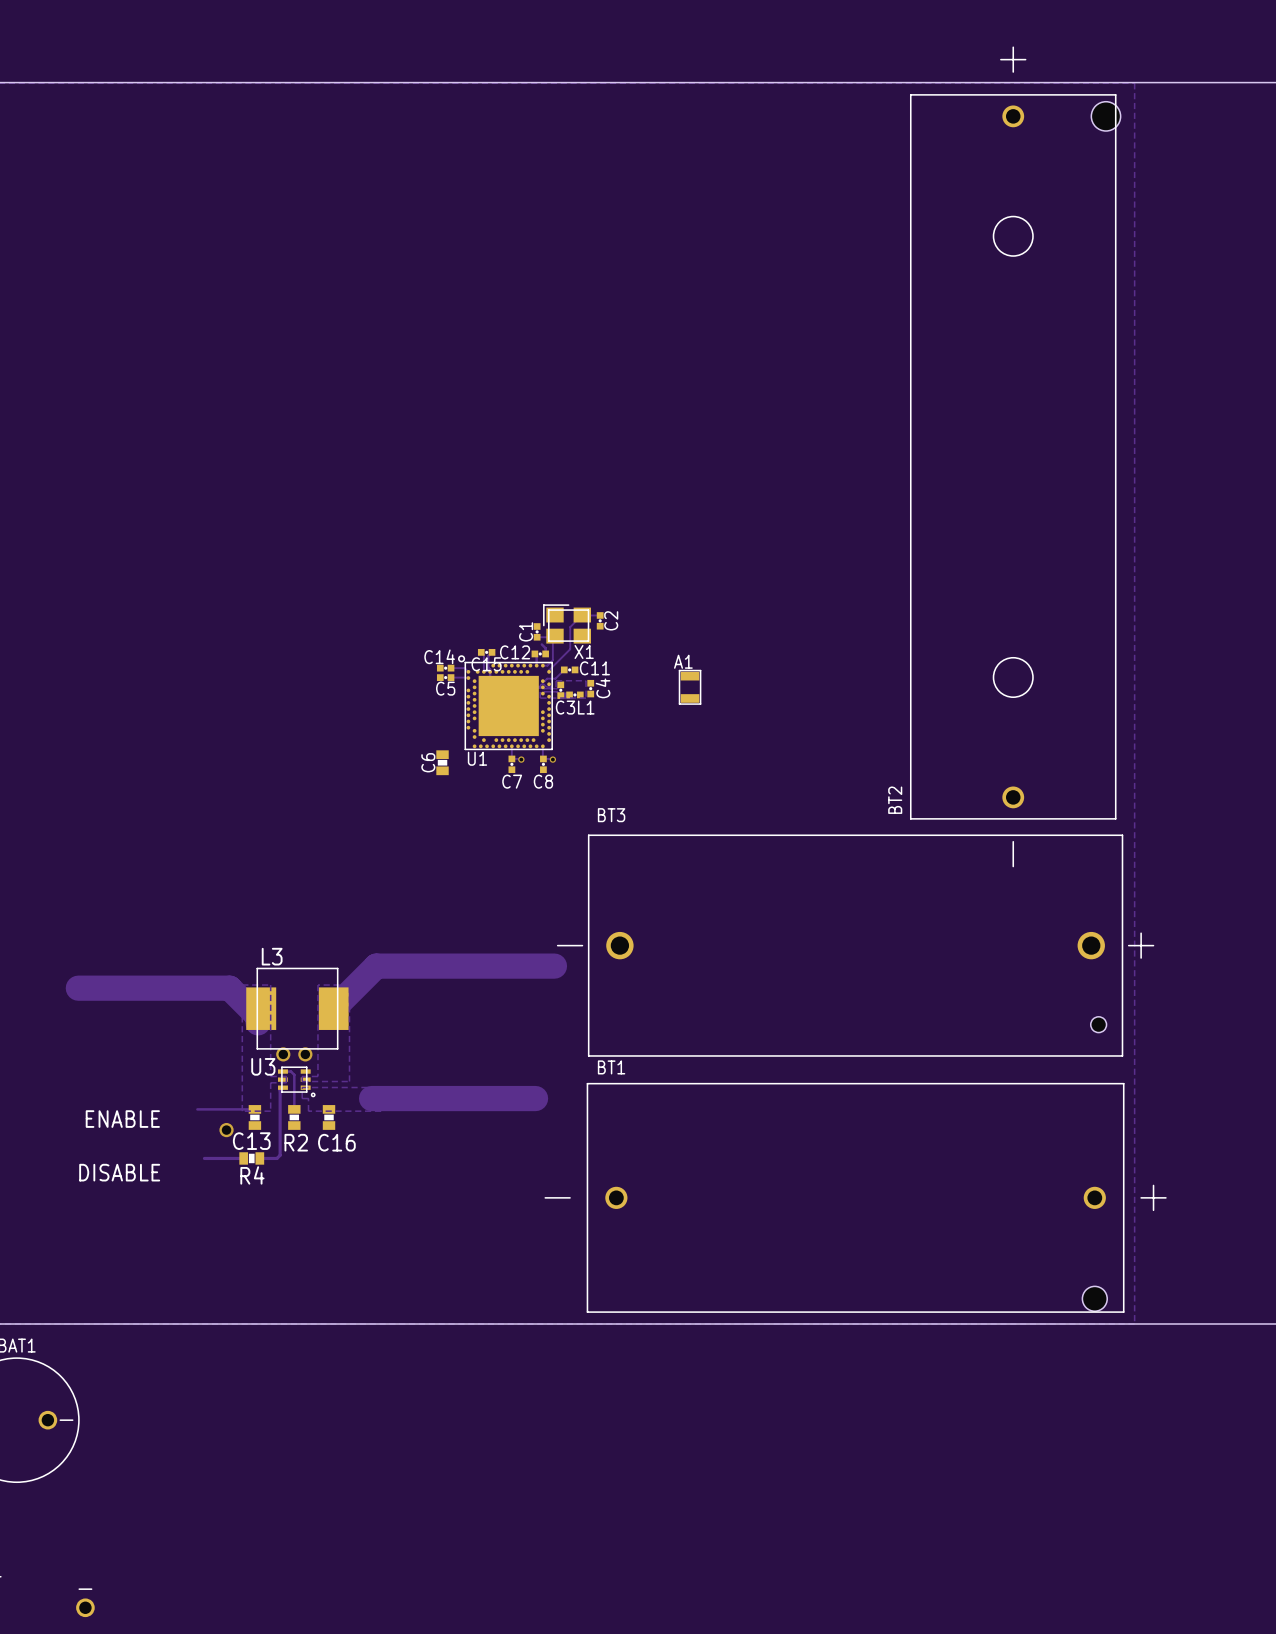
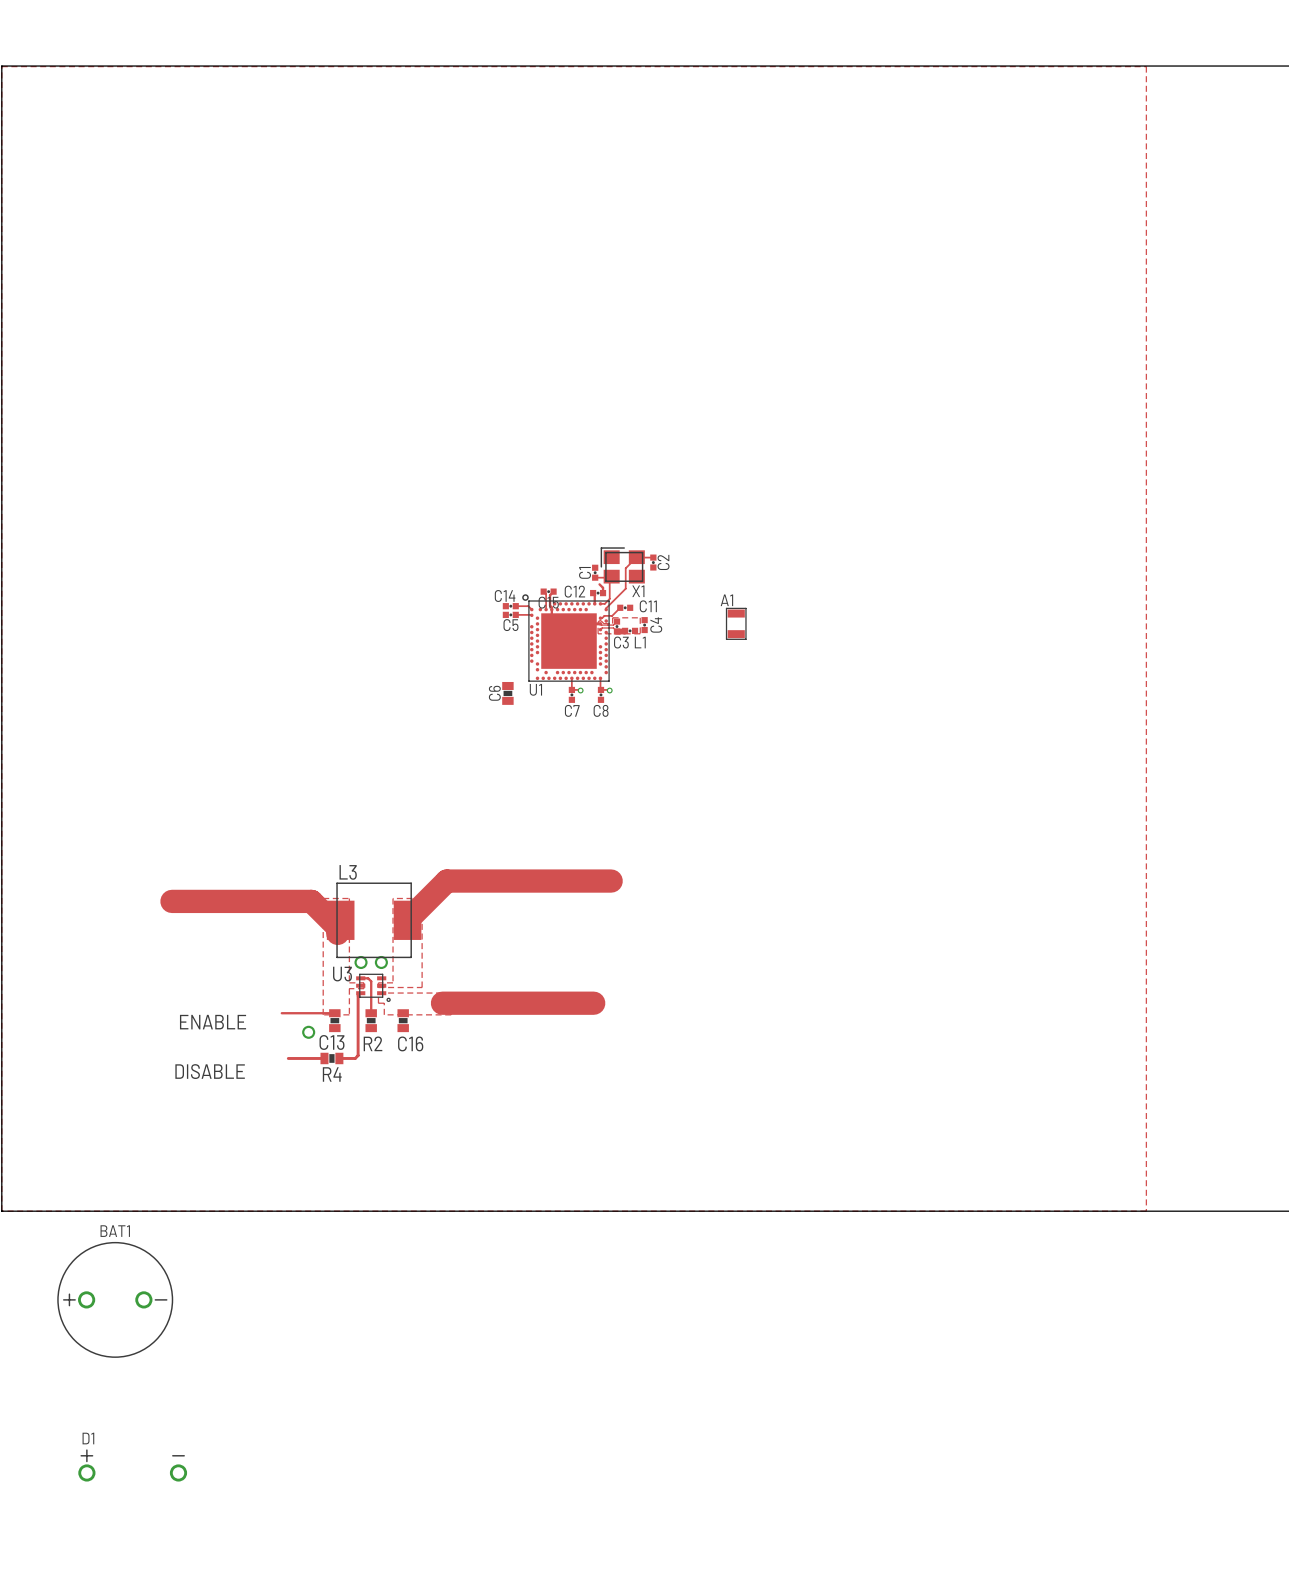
BT2: (1015, 456) -> none
BT3: (855, 945) -> none
BT1: (855, 1197) -> none

